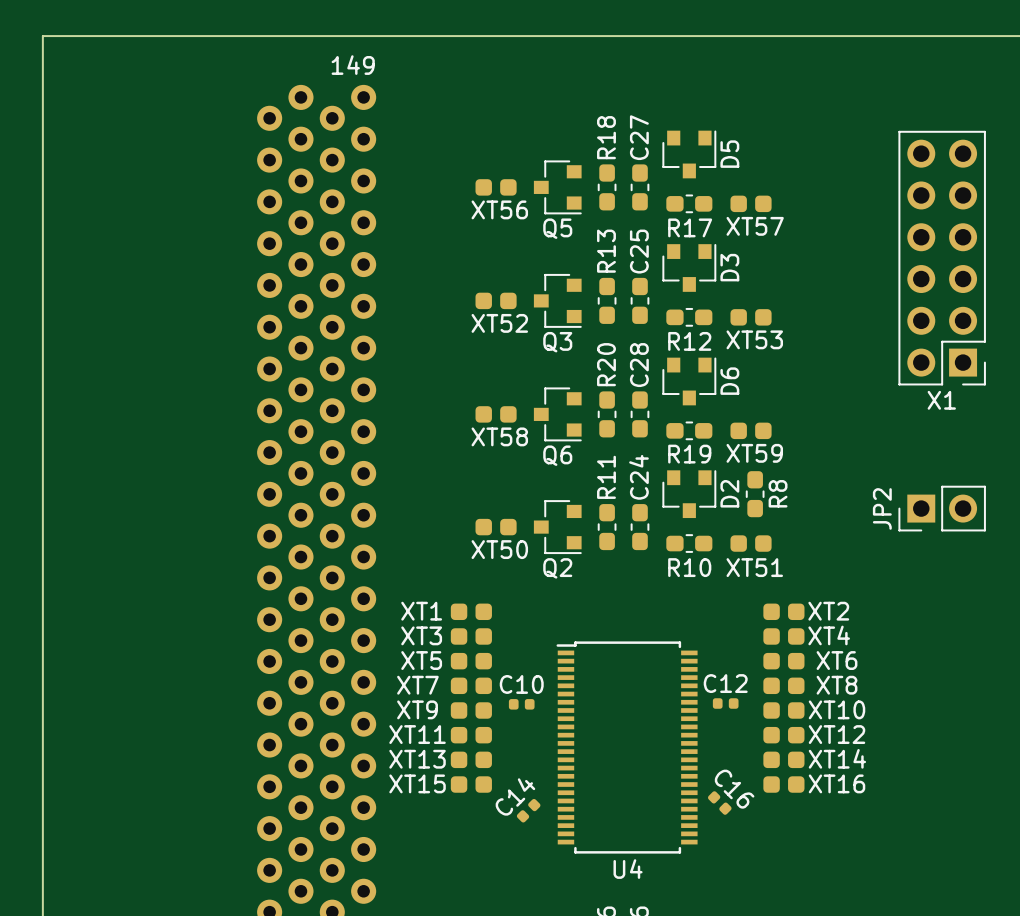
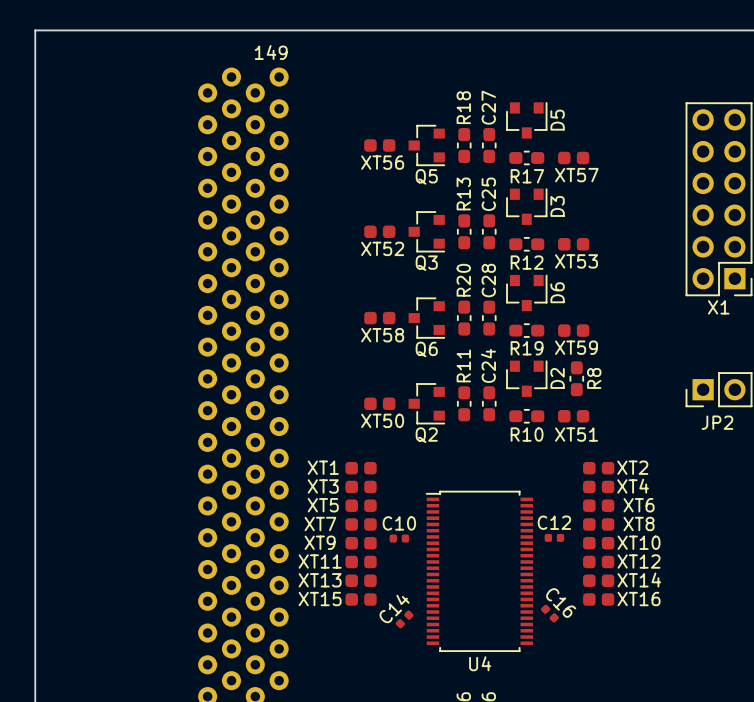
JP2 name rotation: 0° (882, 508) -> 90° clockwise (717, 422)
JP2 name position: JP2 (882, 508) -> JP2 (717, 422)

